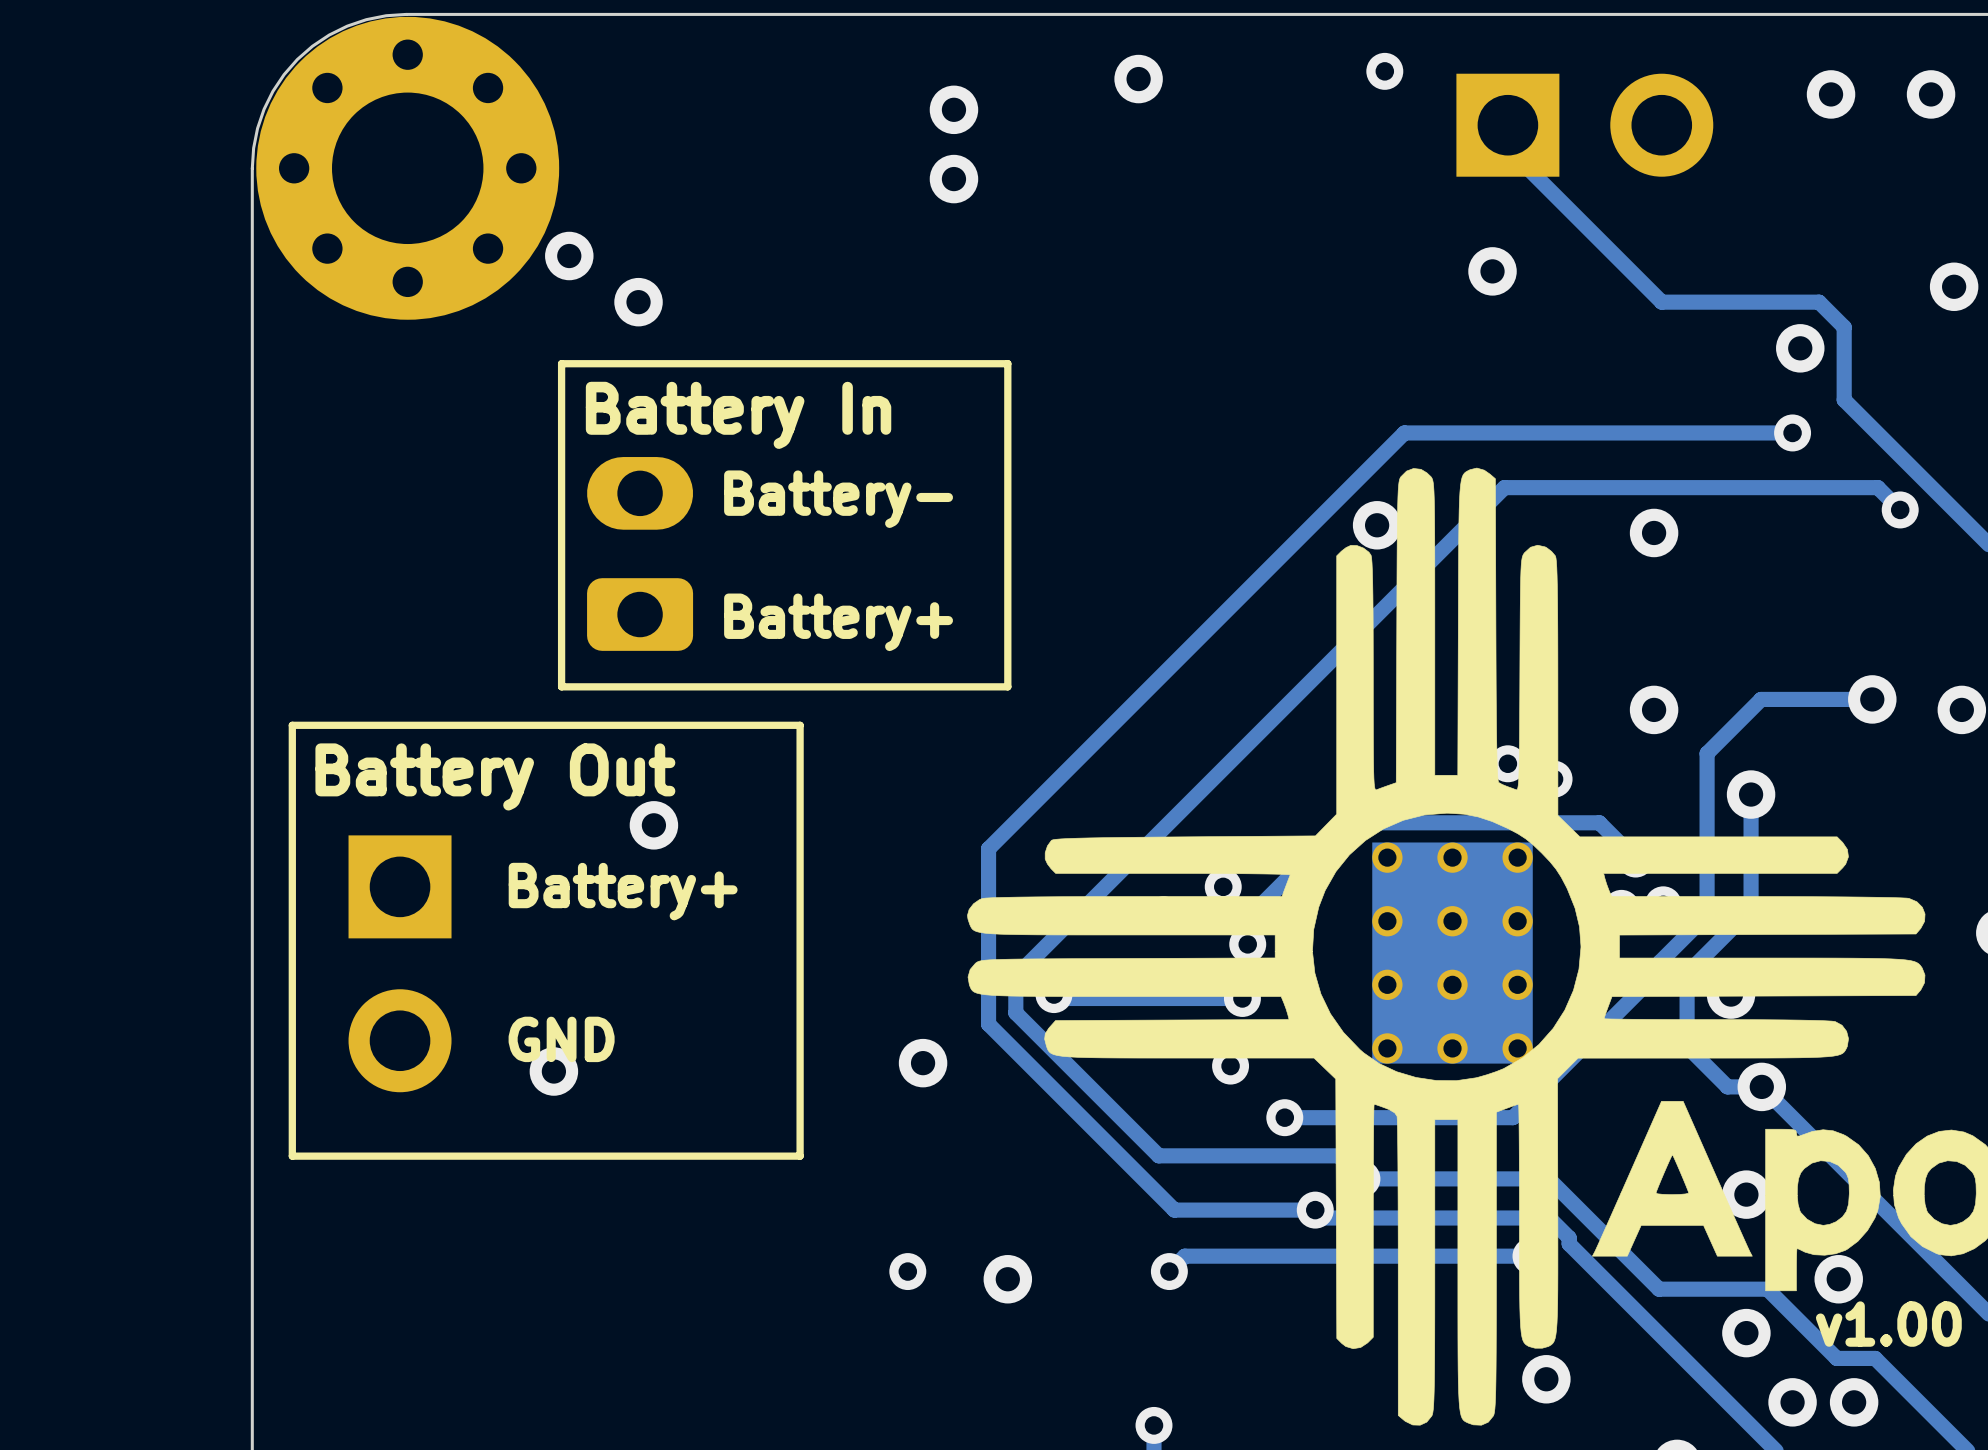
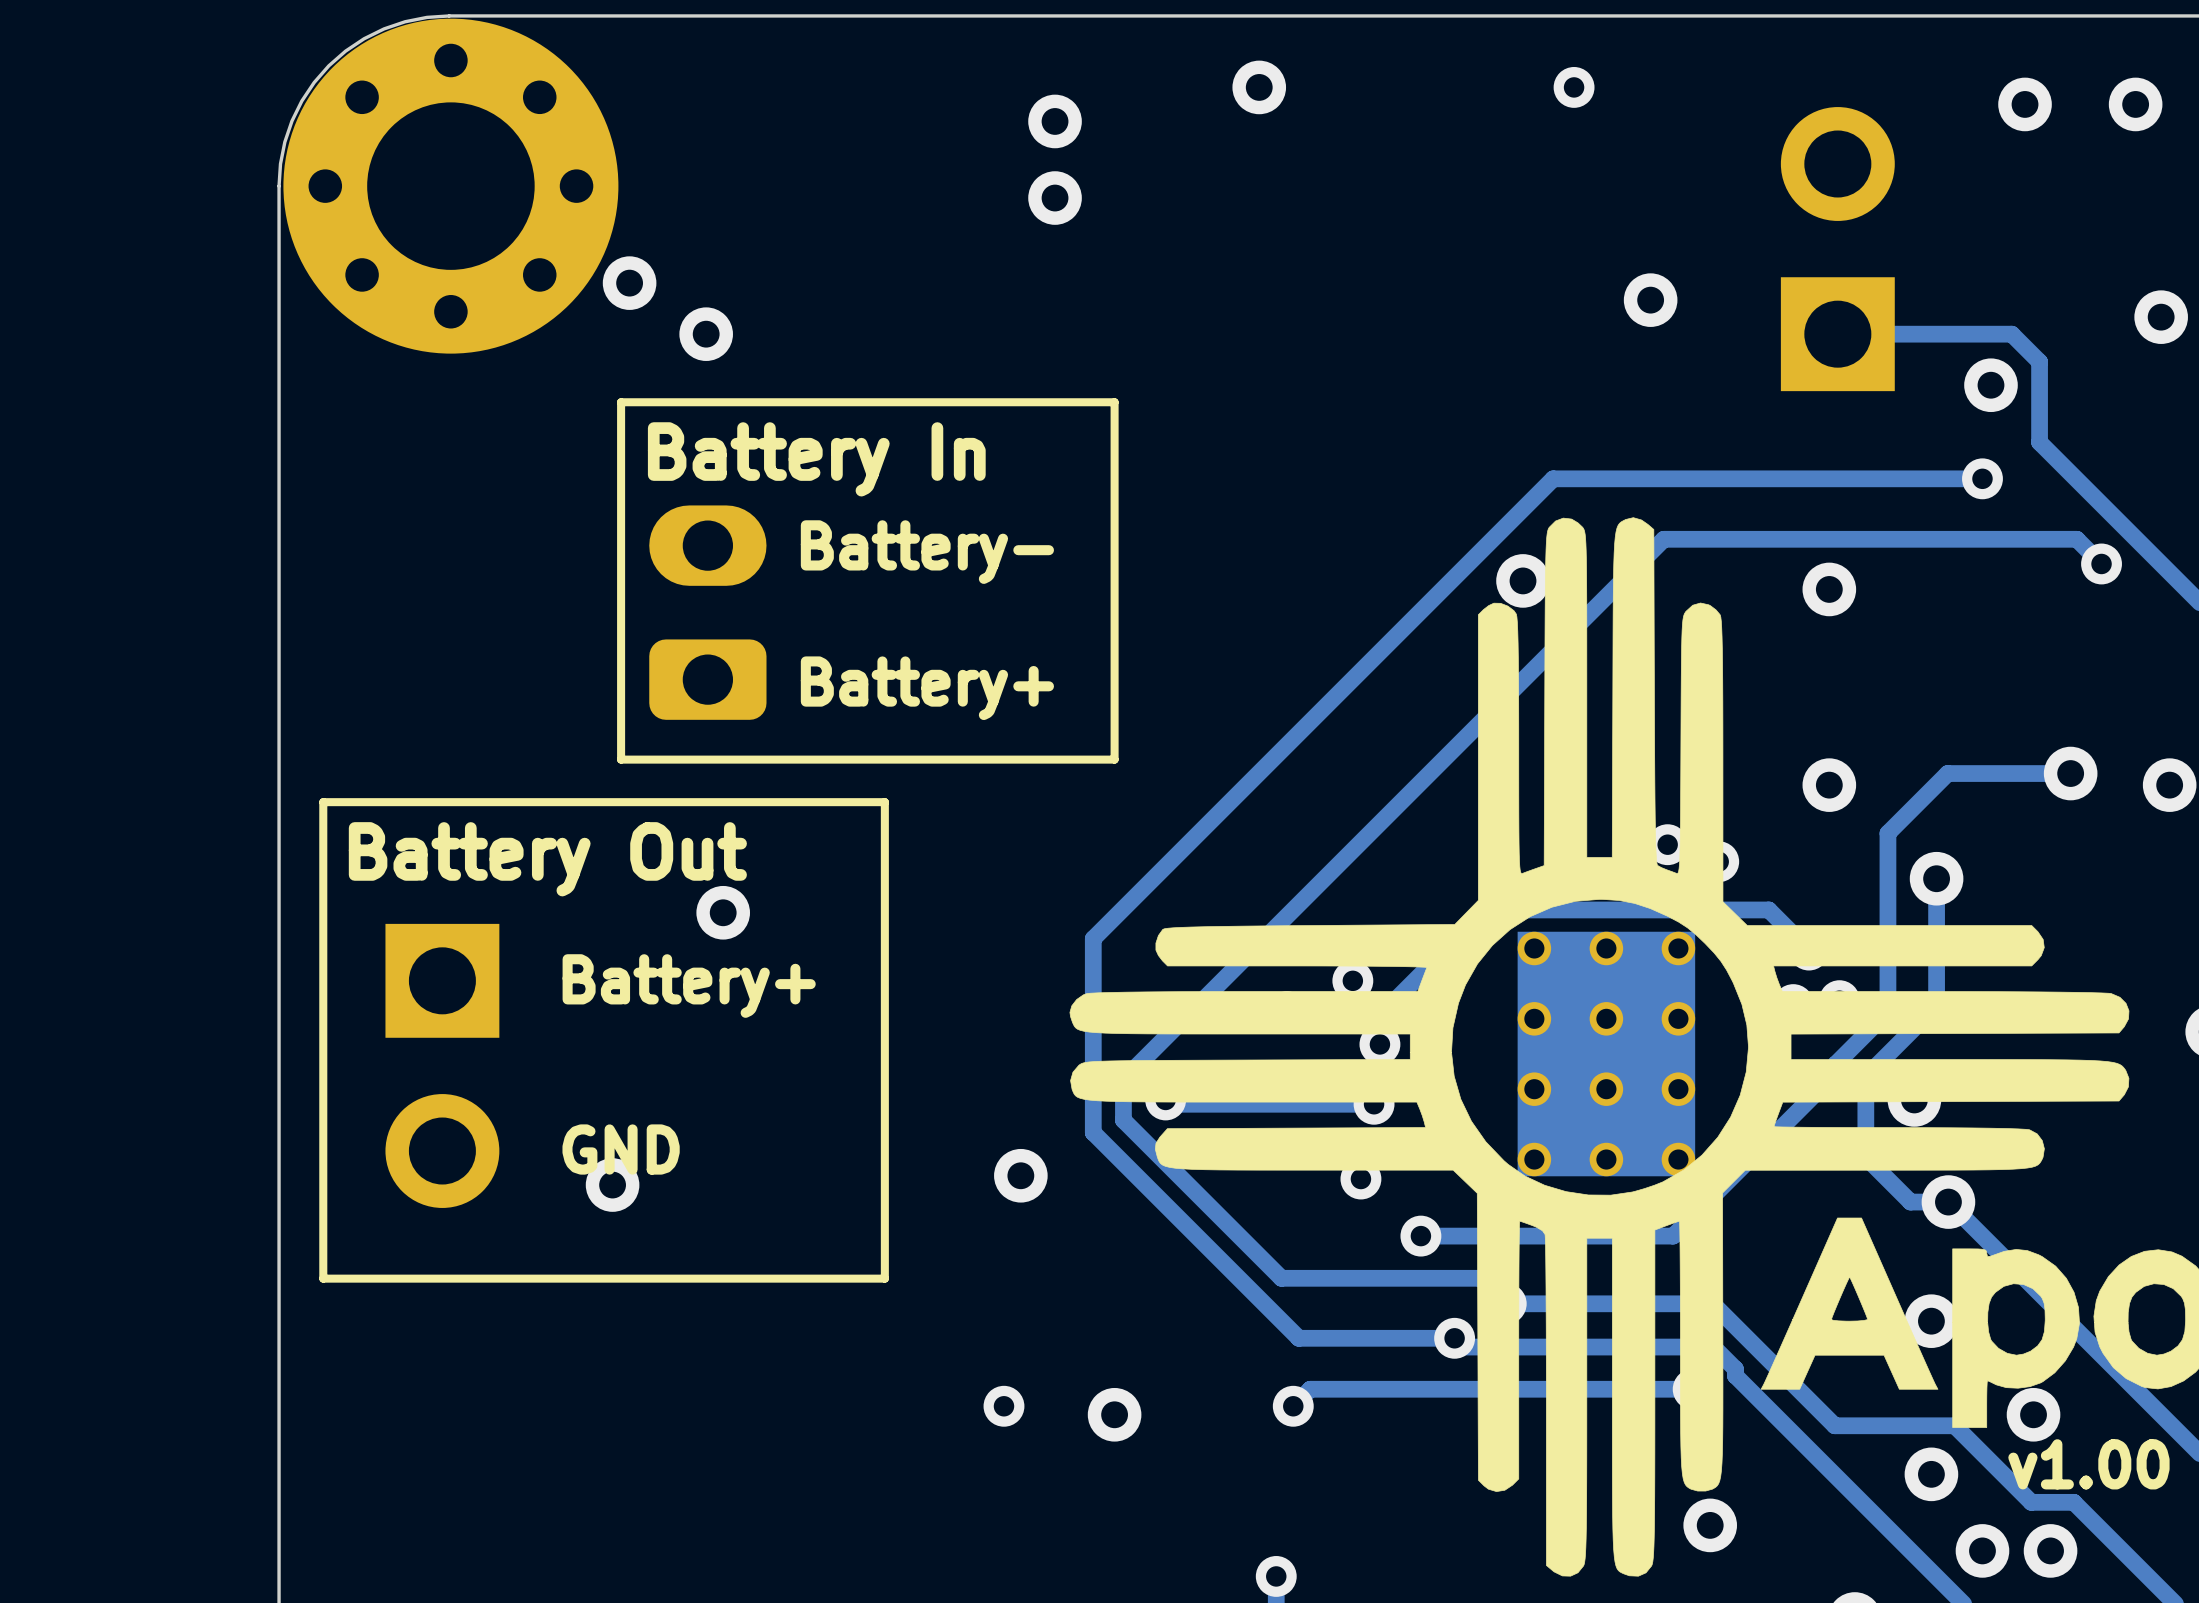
via position: (1384, 71) -> (1574, 87)
track: (1507, 125) (1507, 148) (1661, 302) -> none
part rotation: 0° (1584, 125) -> 90° counterclockwise (1837, 249)

